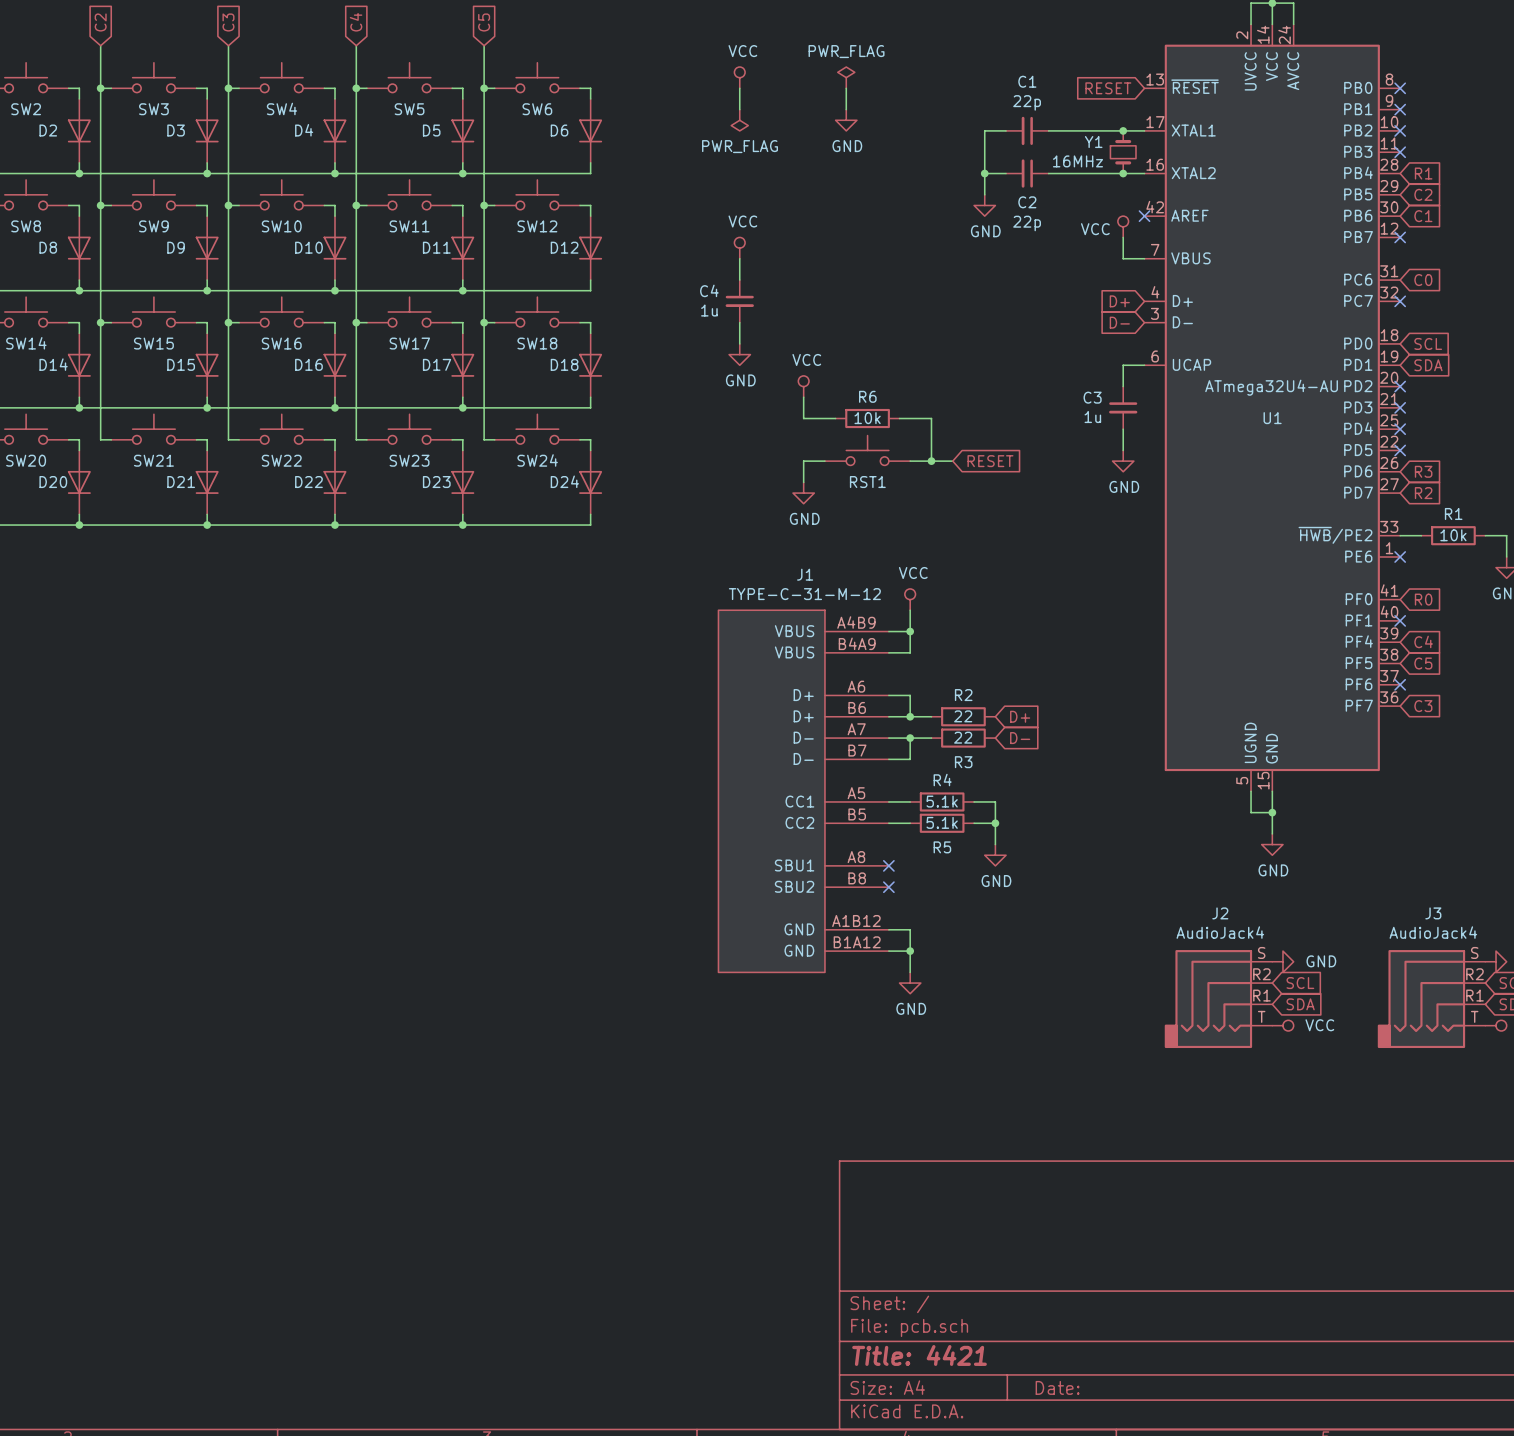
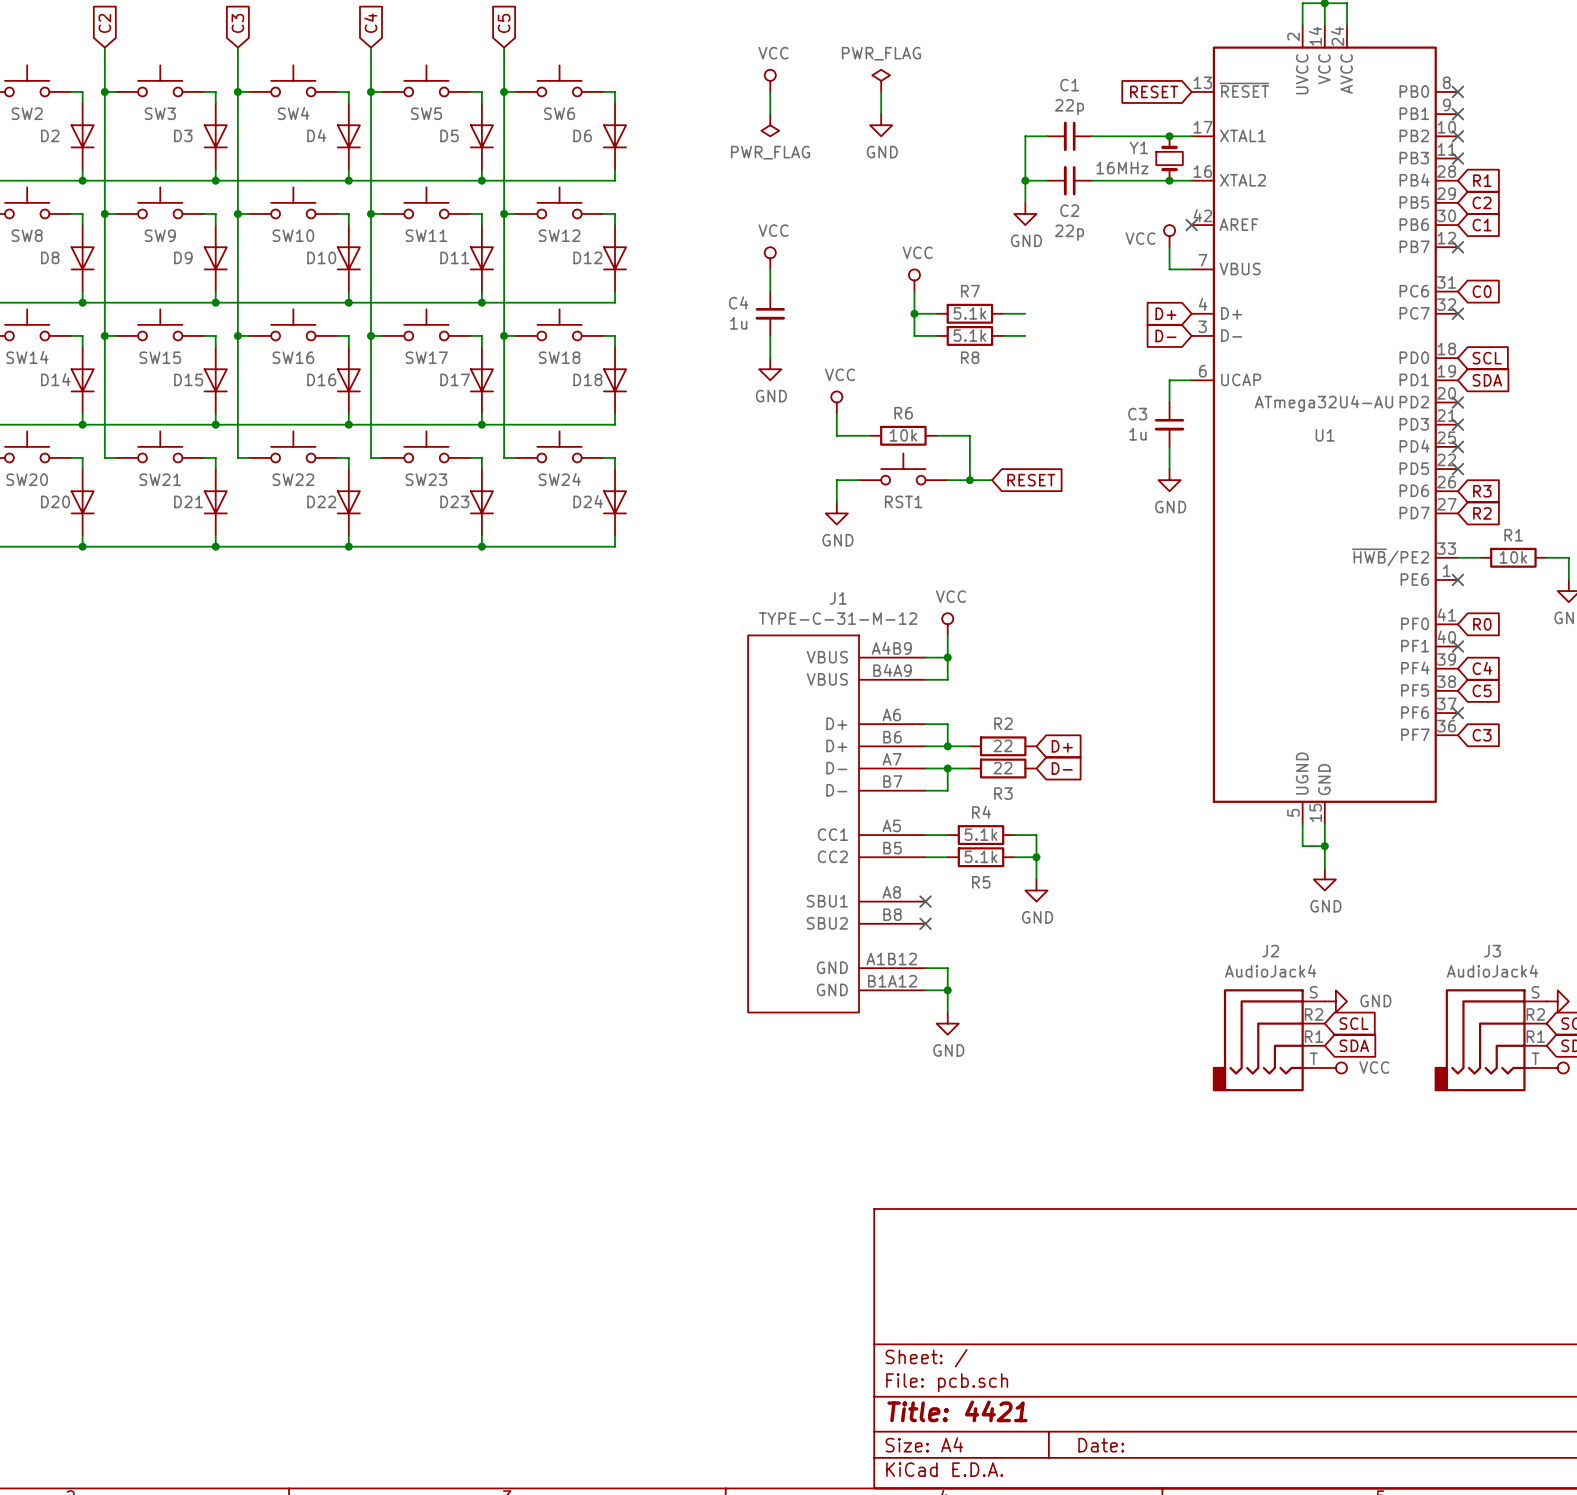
power symbol: none -> VCC (914, 280)
wire: none -> (914, 291) (914, 335) (936, 335)
wire: none -> (914, 313) (936, 313)
junction: none -> (914, 313)
R7: none -> 5.1k (969, 313)
wire: none -> (1003, 313) (1025, 313)
R8: none -> 5.1k (969, 335)
wire: none -> (1003, 335) (1025, 335)

